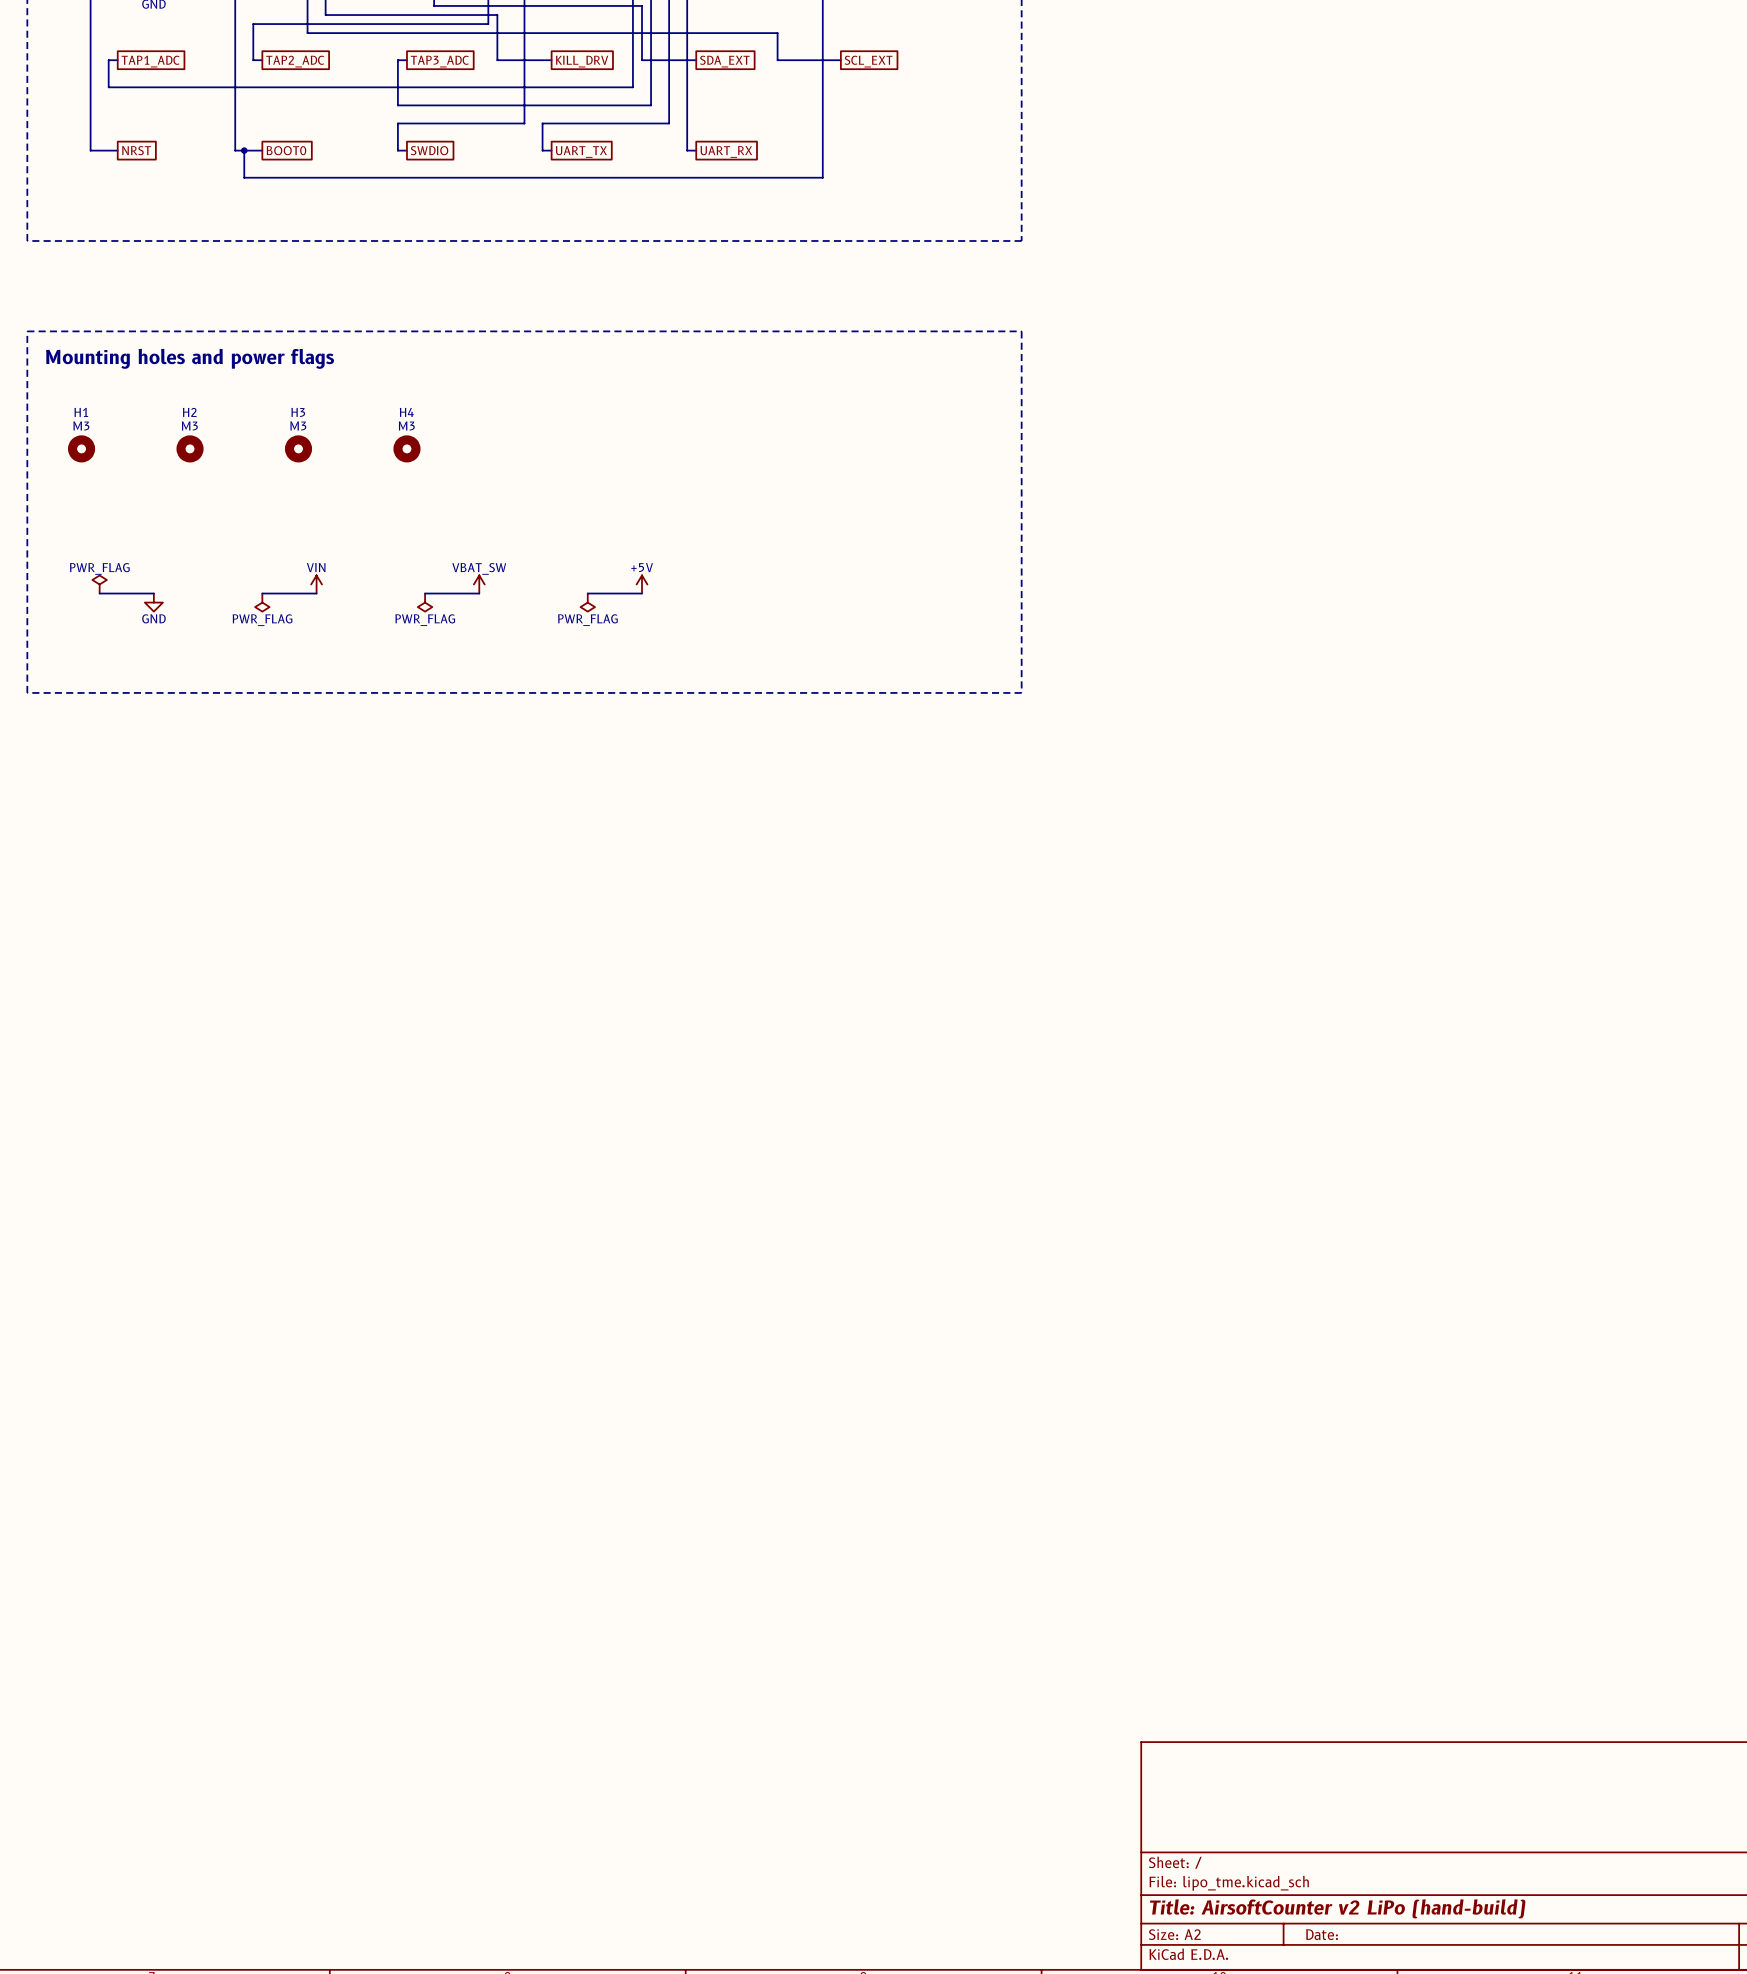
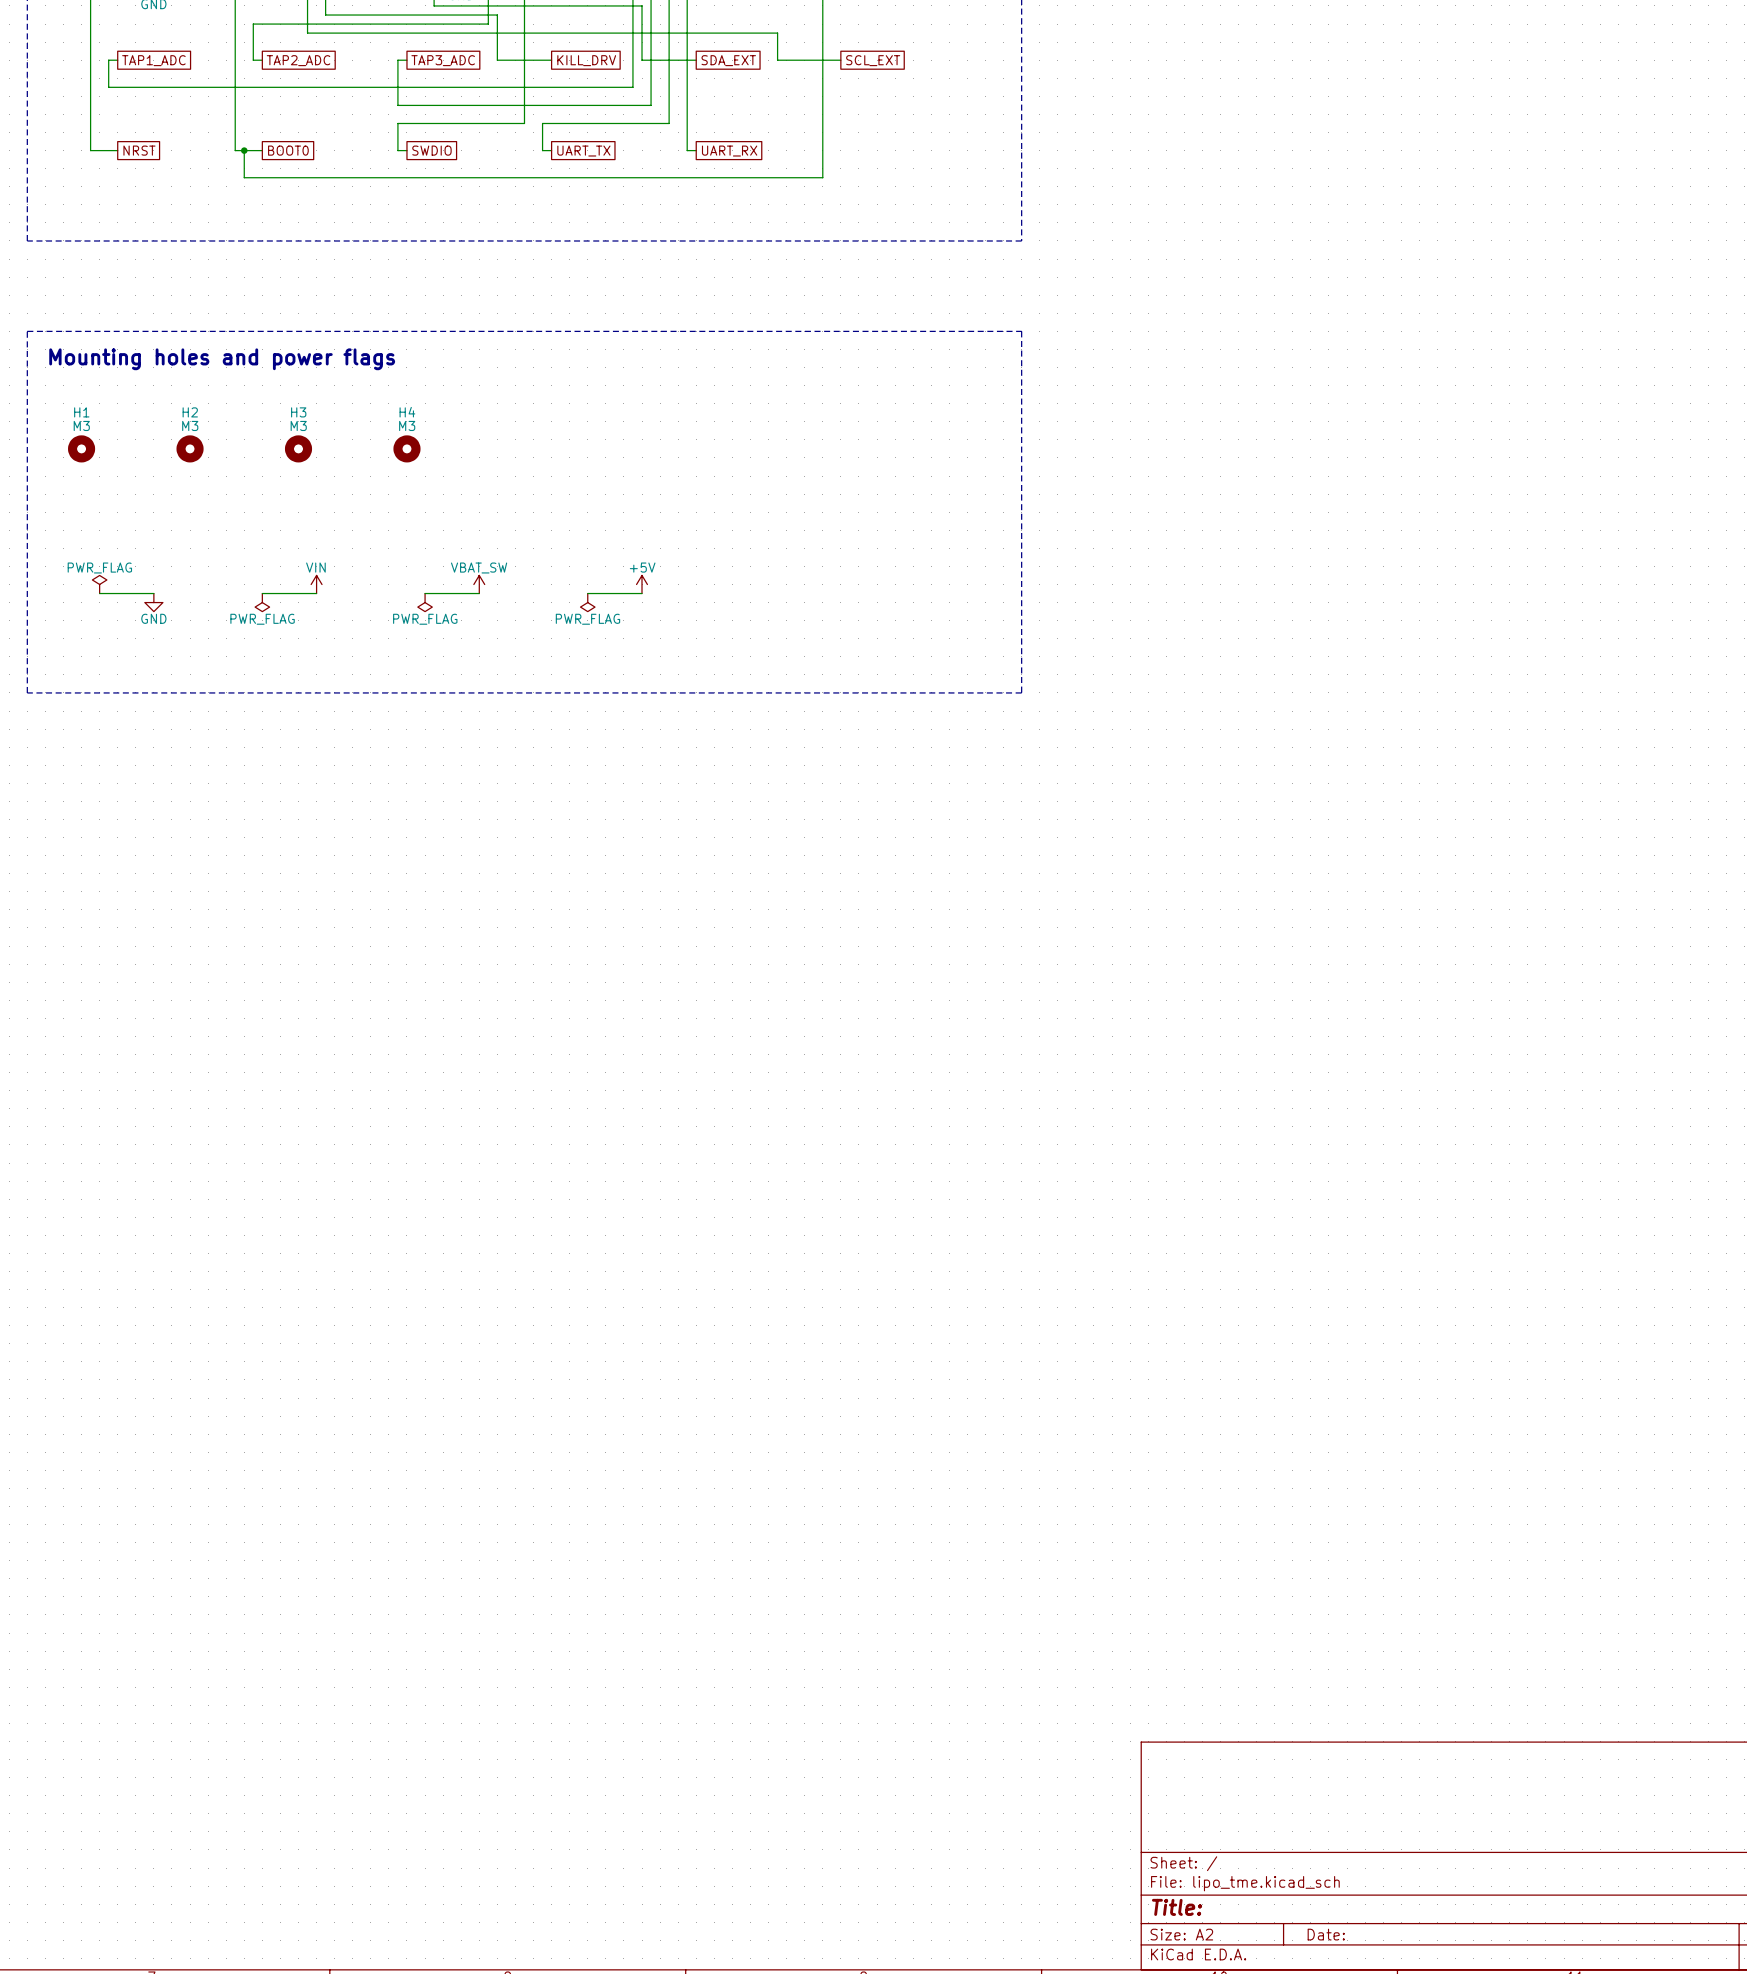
title block: Title: AirsoftCounter v2 LiPo (hand-build) (1337, 1908) -> Title: (1177, 1907)

